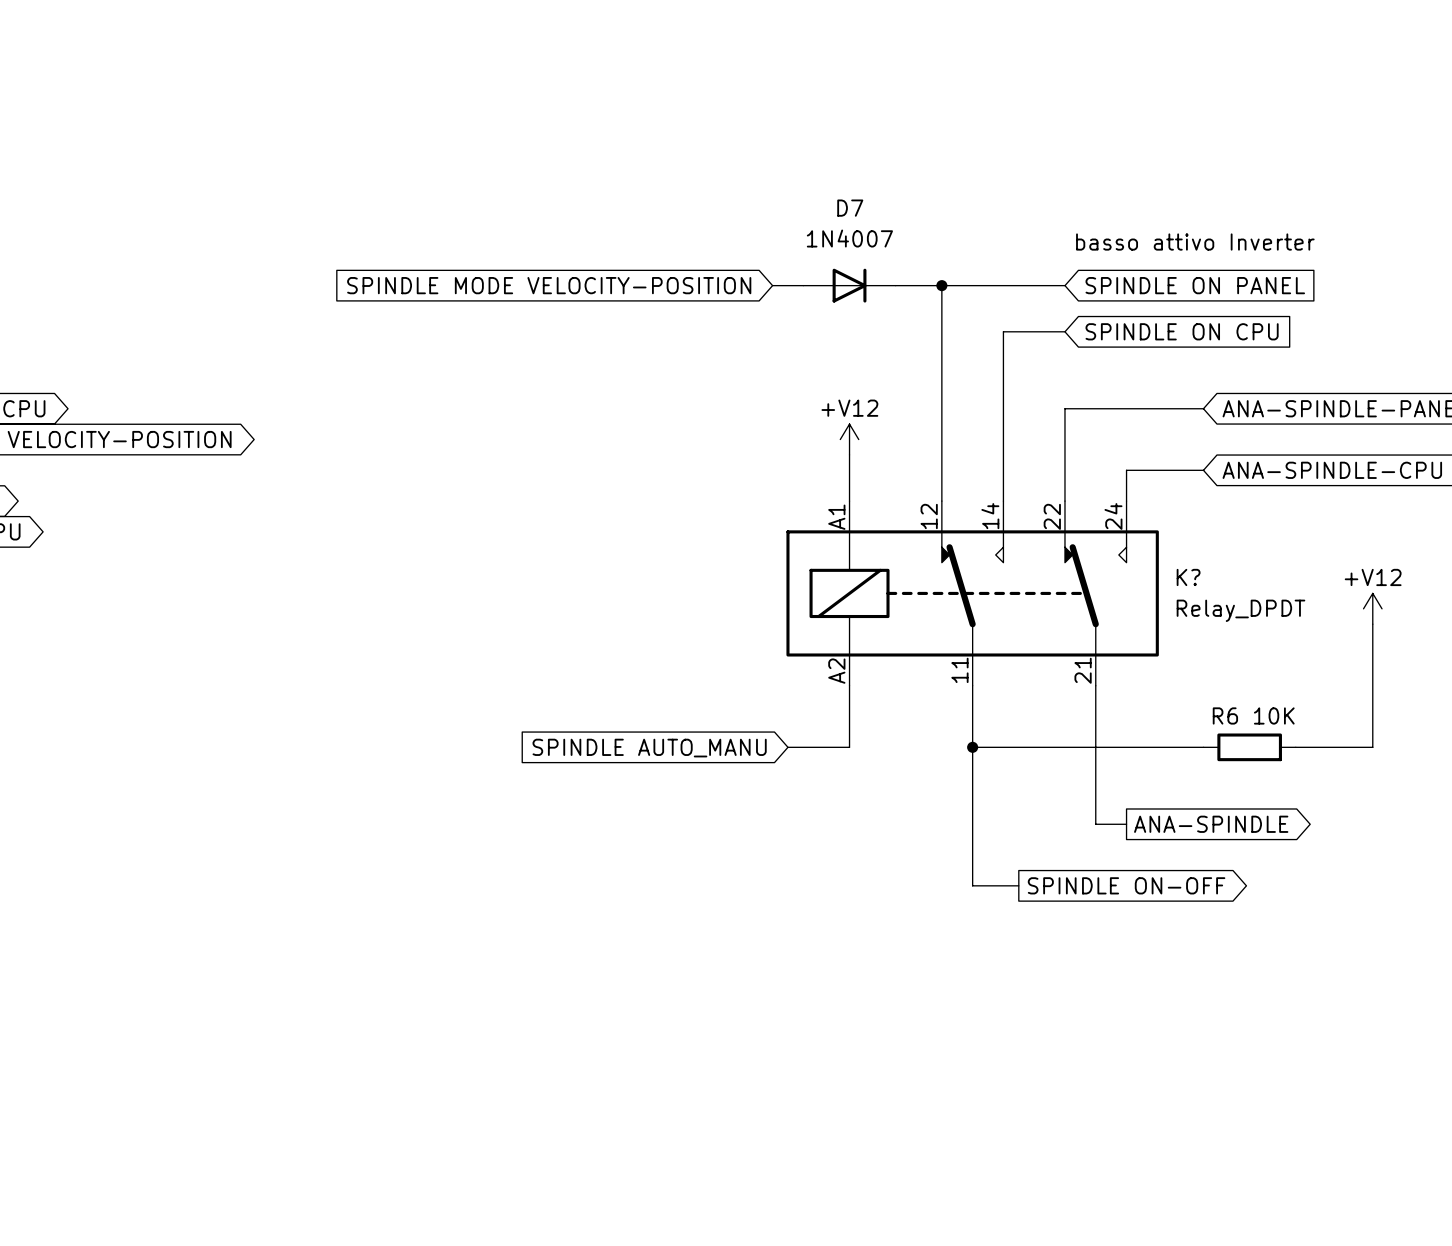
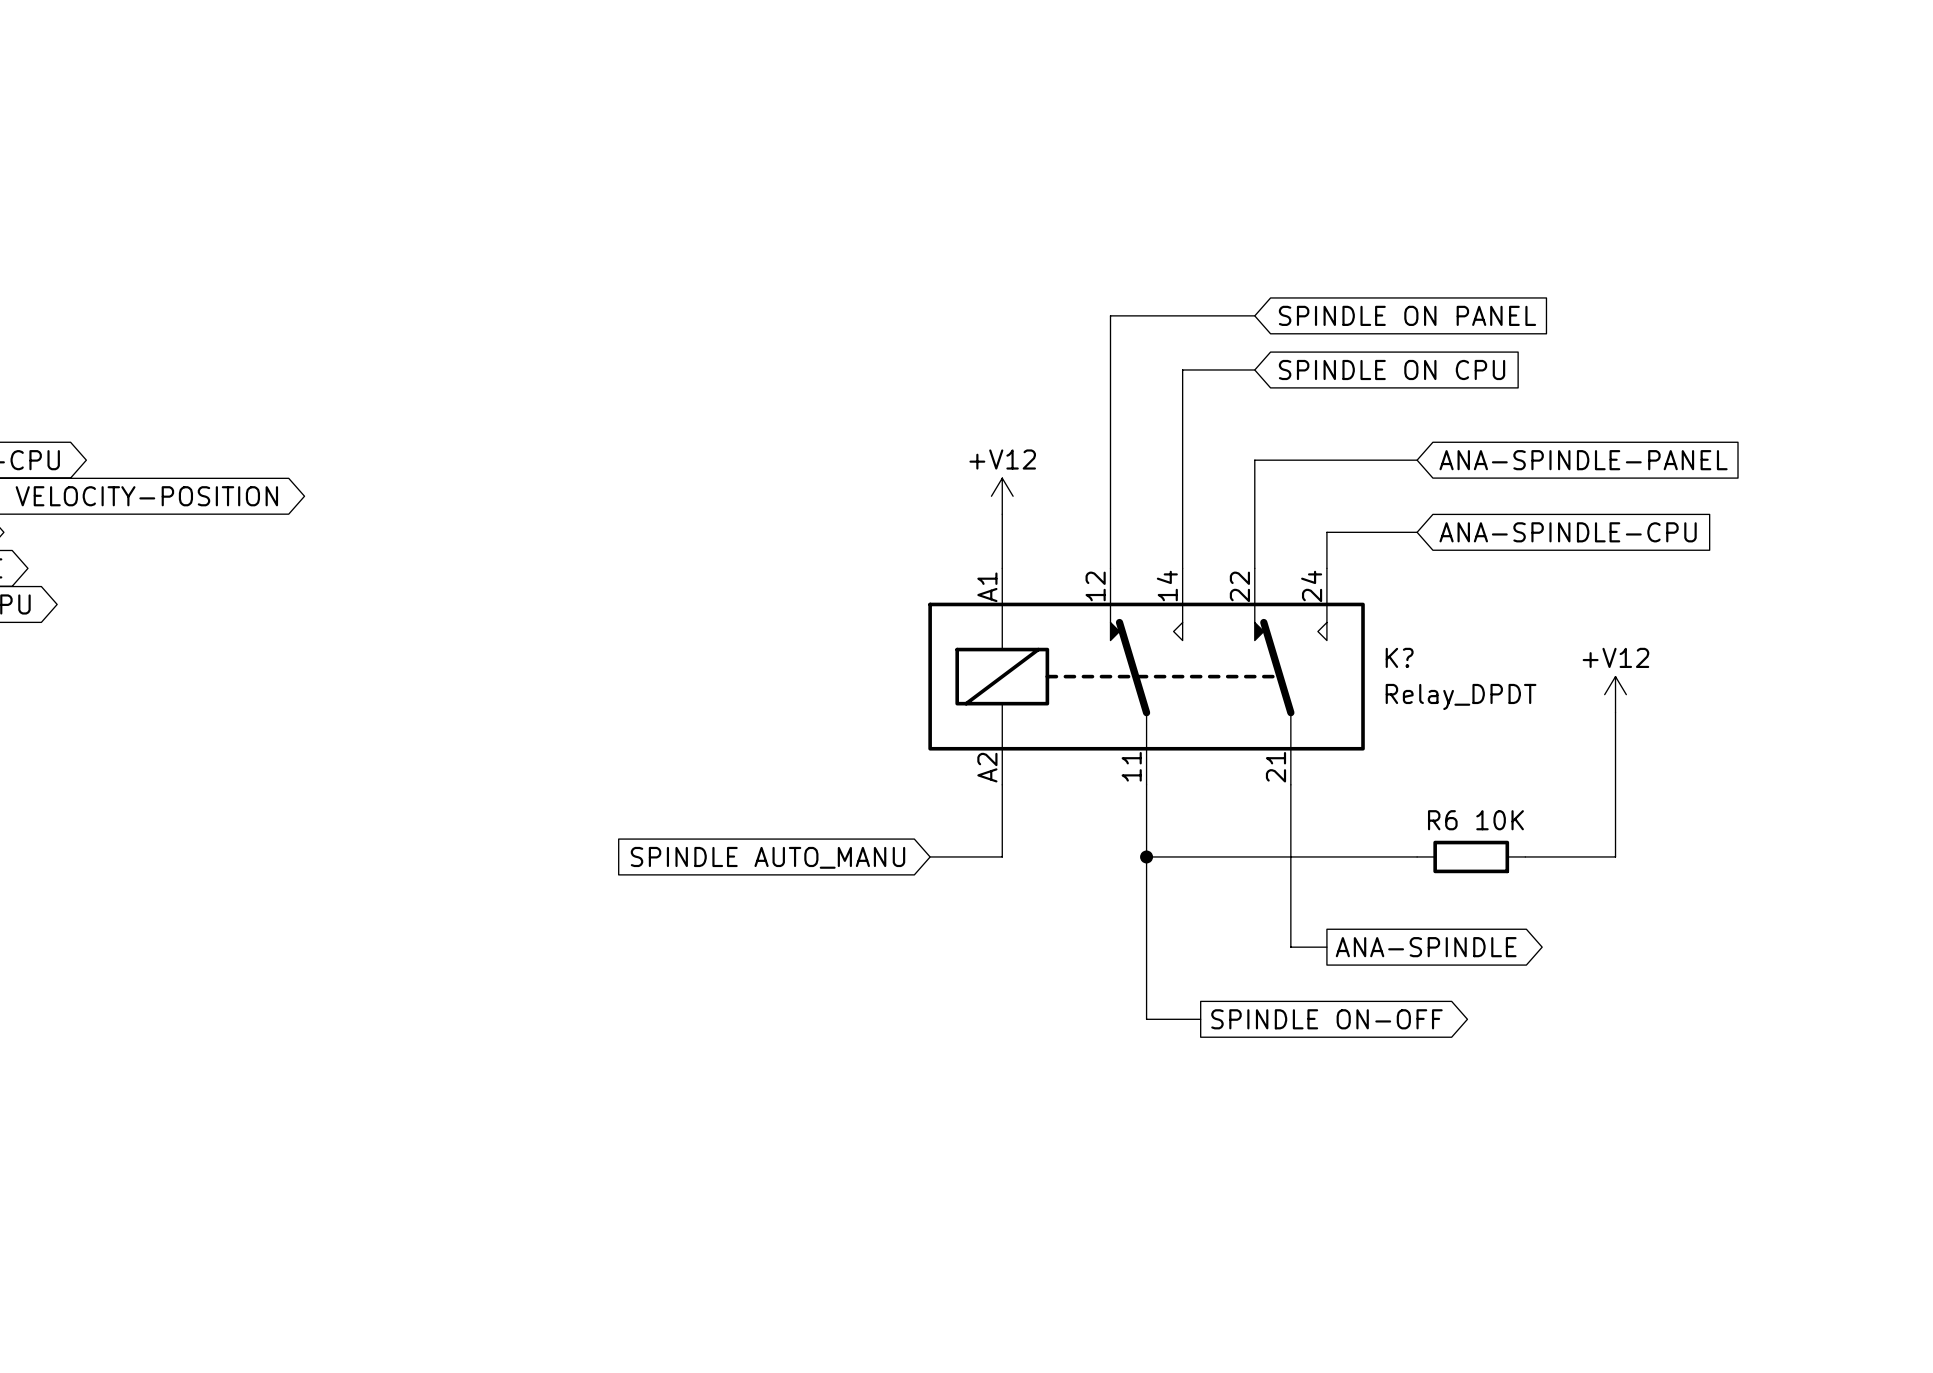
text: basso attivo Inverter (1195, 242) -> none
global label: SPINDLE MODE VELOCITY-POSITION (549, 285) -> none
wire: (772, 285) (803, 285) -> none
D7: 1N4007 (849, 285) -> none
wire: (895, 285) (941, 285) -> none
junction: (941, 285) -> none

